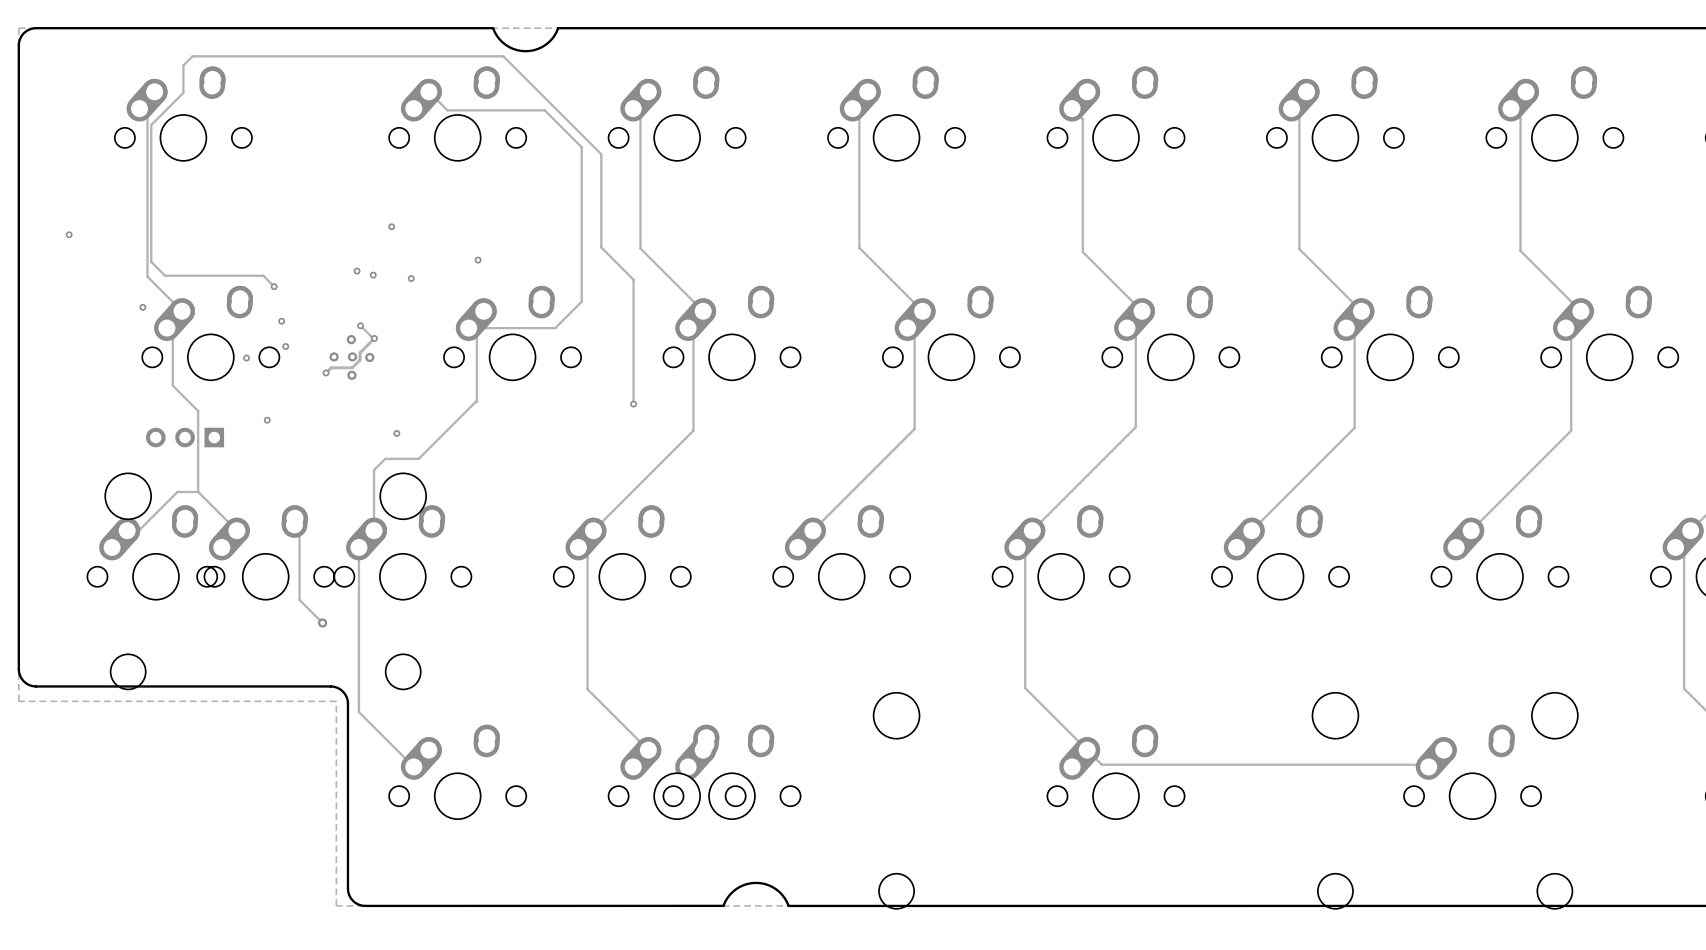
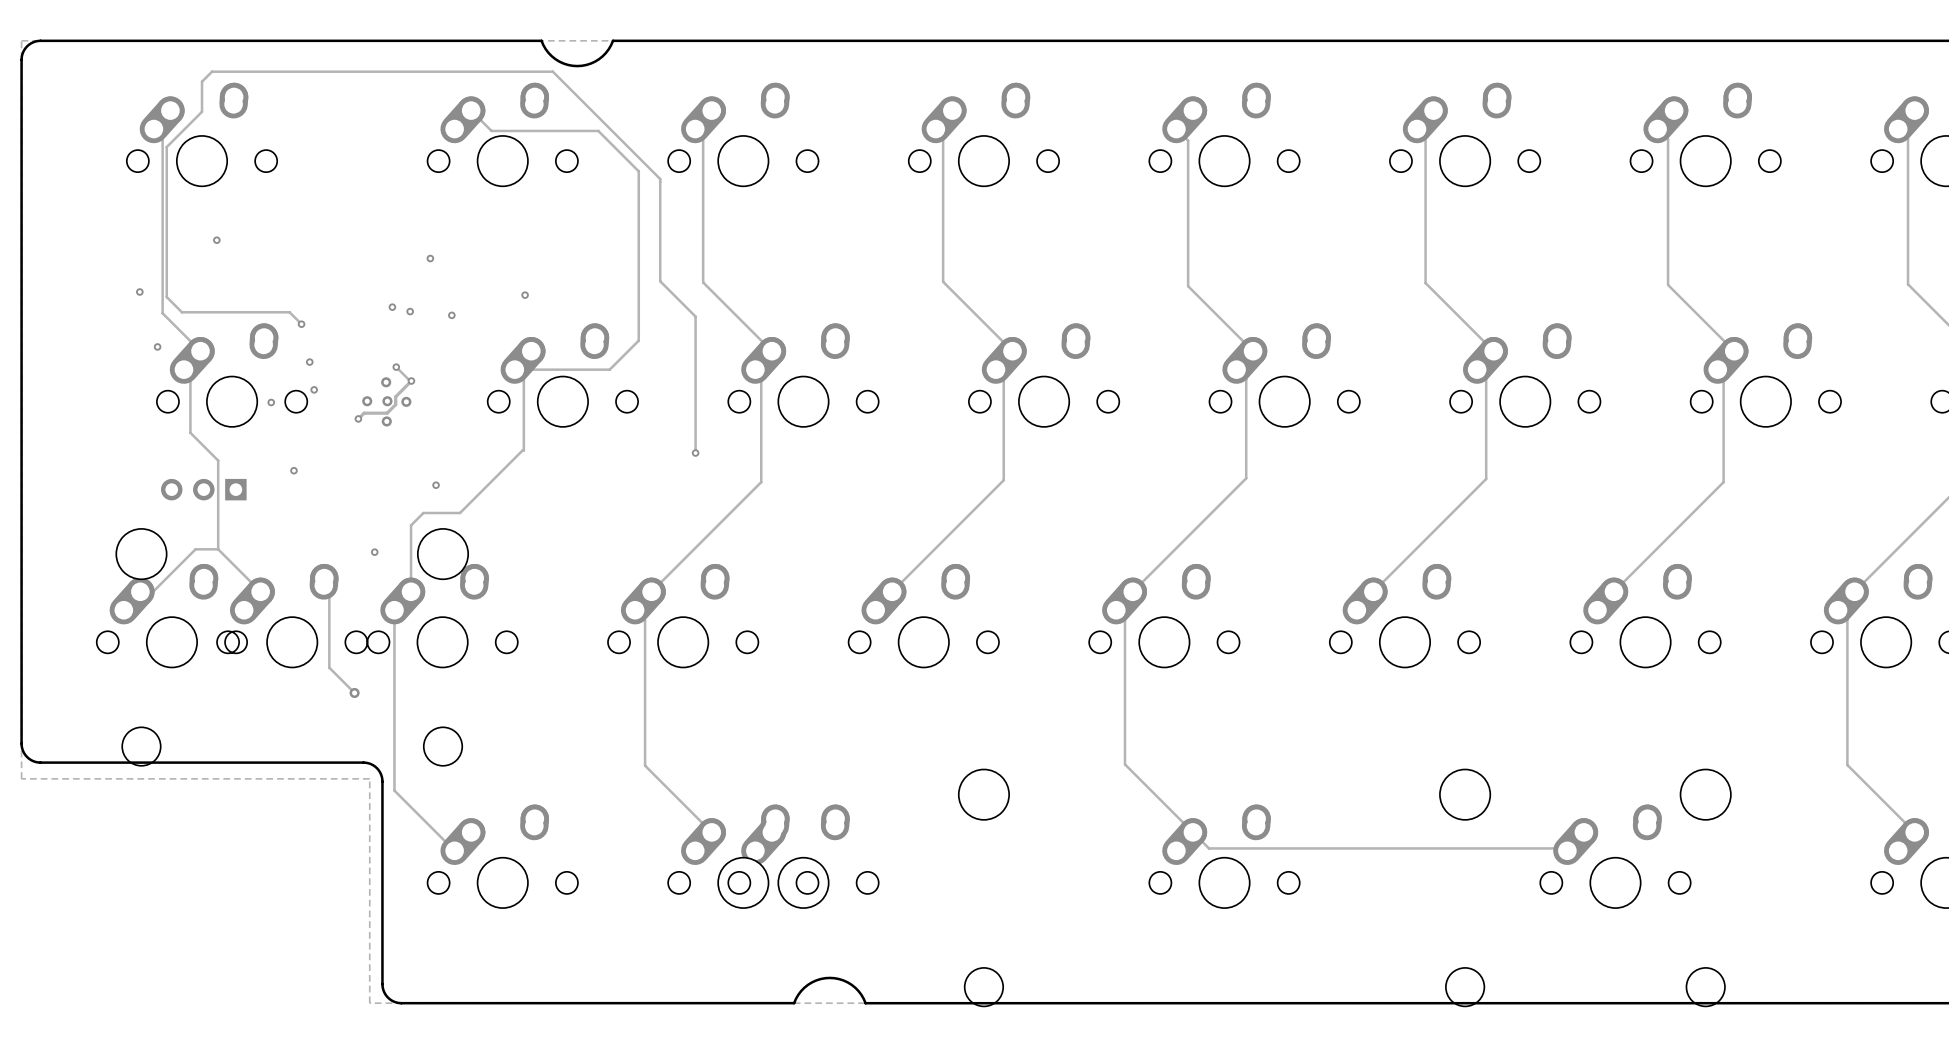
via: none -> (216, 240)
via position: (69, 234) -> (139, 291)
via: none -> (374, 552)

